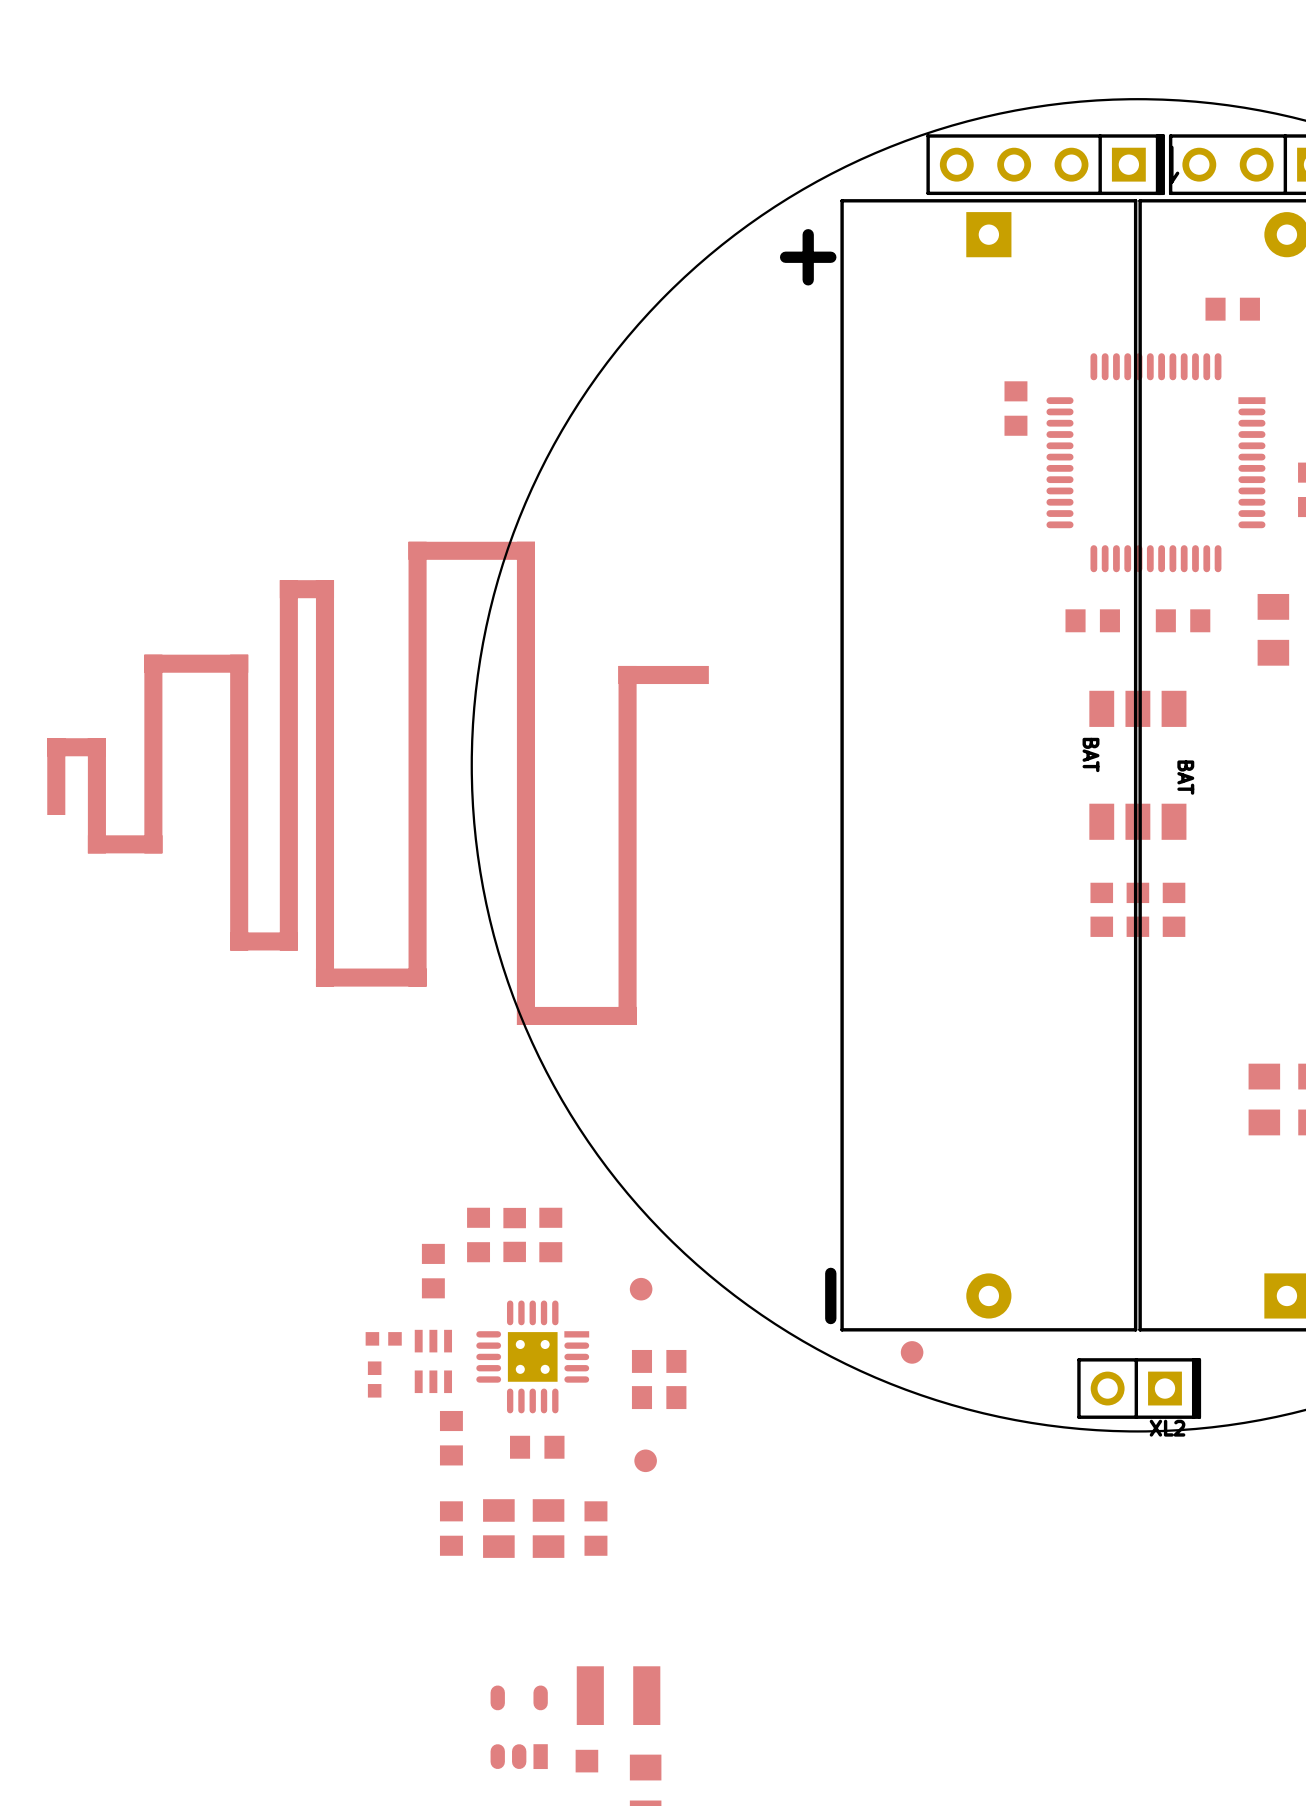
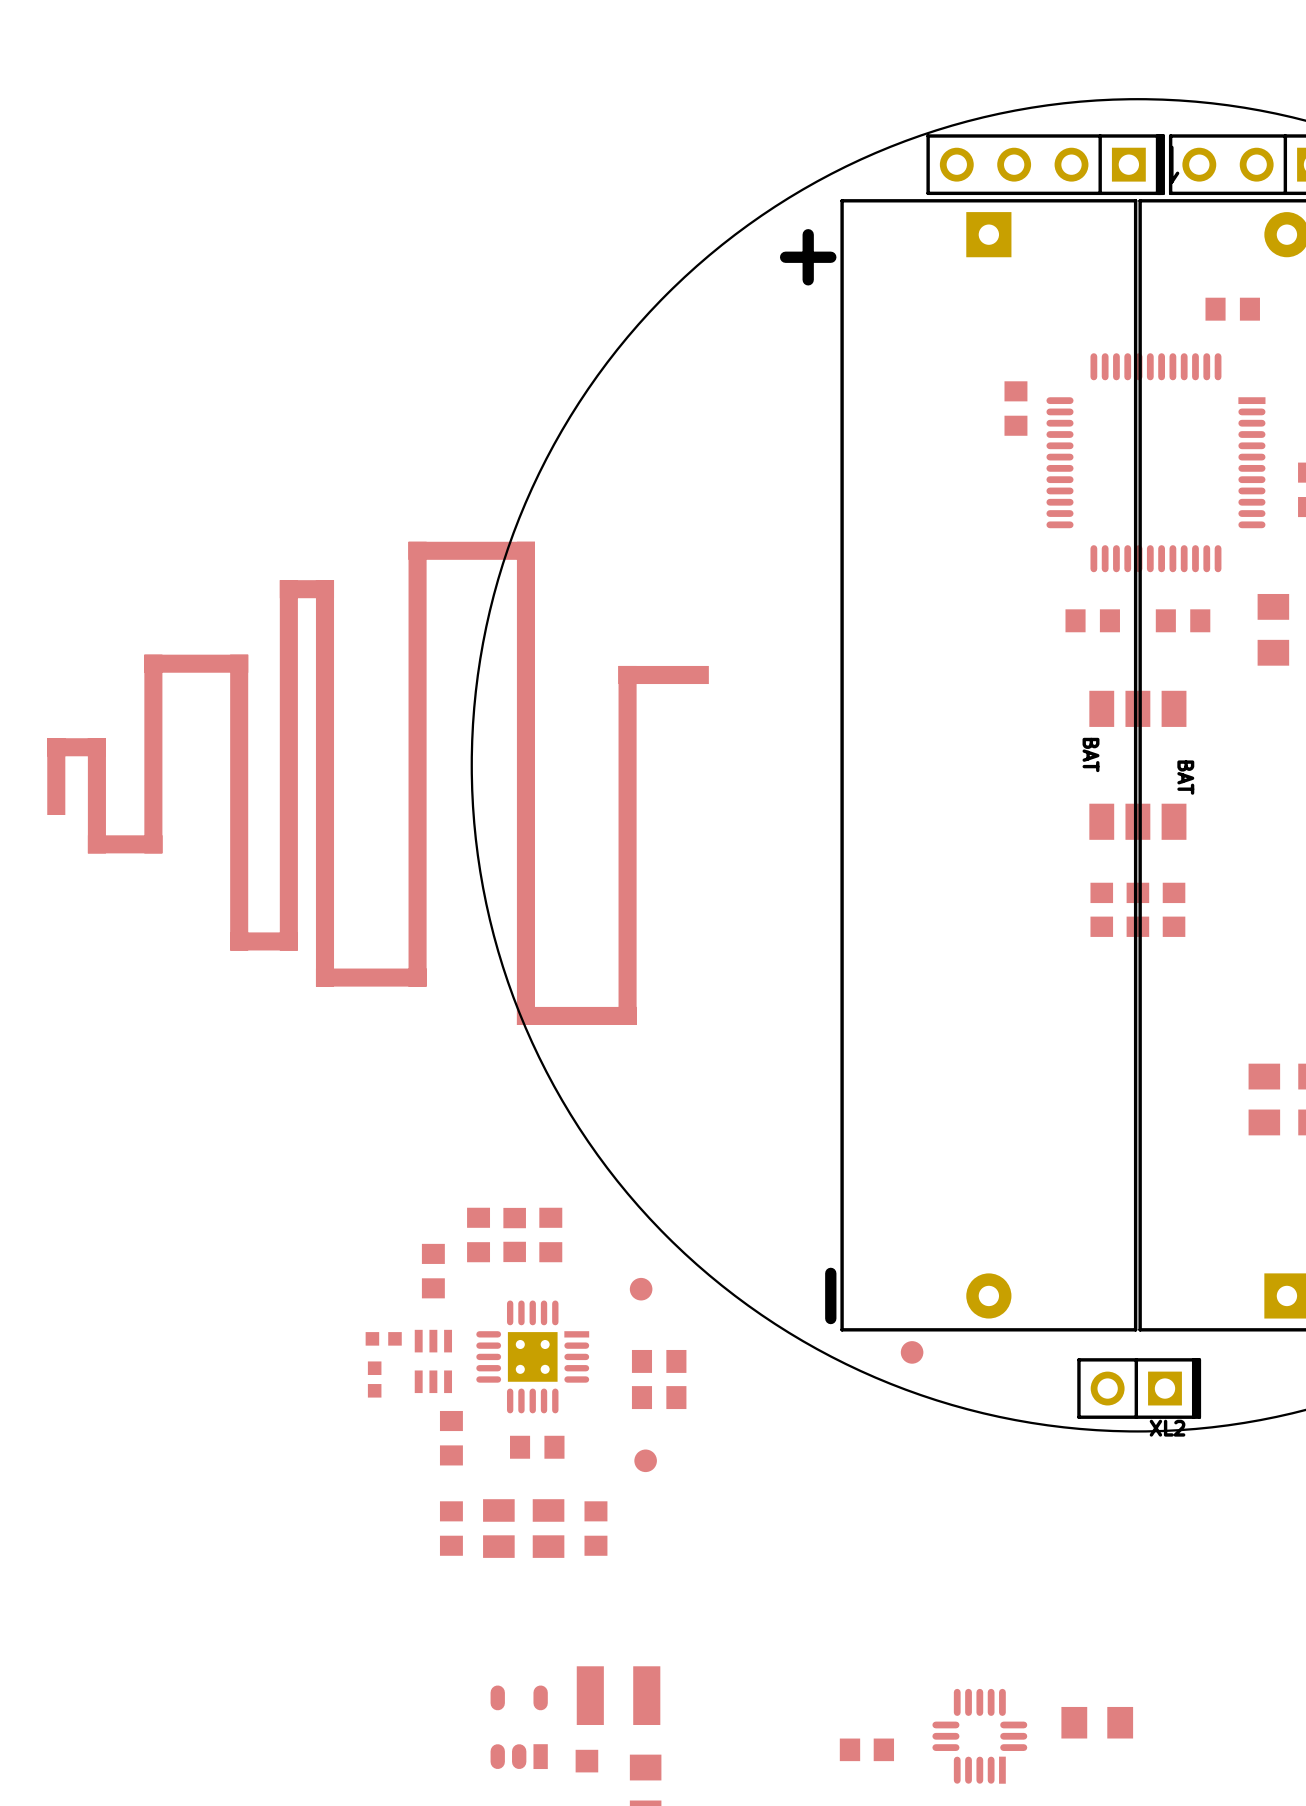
part: none -> (1097, 1722)
part: none -> (979, 1736)
part: none -> (866, 1749)

